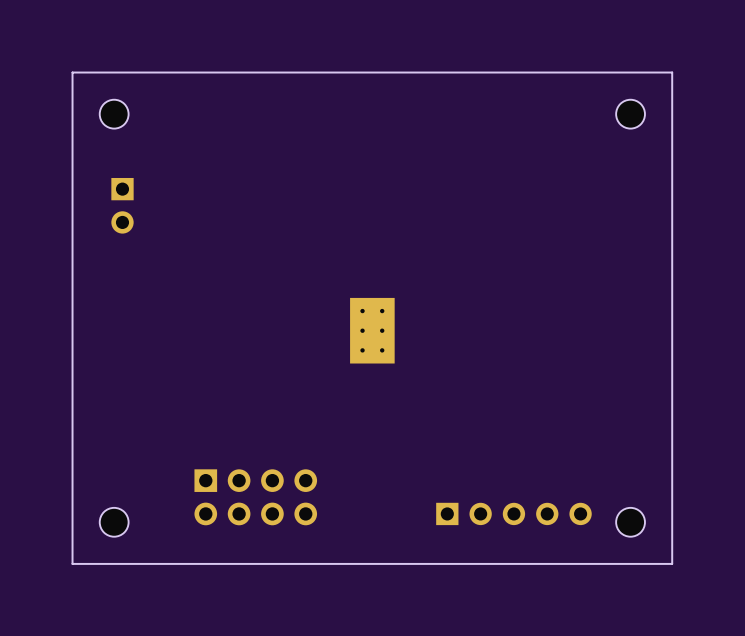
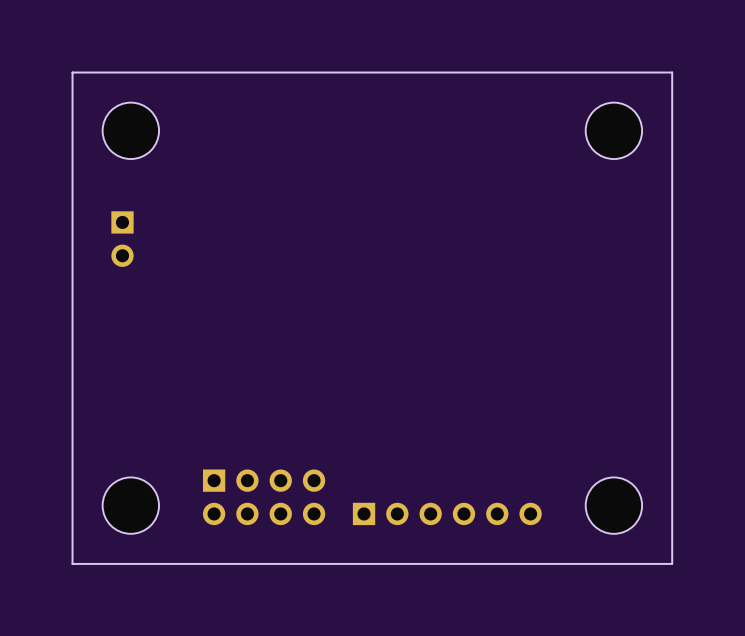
part: (114, 114) -> none
part: (630, 114) -> none
part: none -> (130, 130)
part: none -> (613, 130)
part position: (122, 205) -> (122, 239)
part: (372, 330) -> none
part footprint: [194, 469, 318, 526] -> [202, 469, 326, 526]
part: none -> (130, 505)
part: none -> (613, 505)
part: none -> (447, 513)
part: (513, 513) -> none
part: (114, 522) -> none
part: (630, 522) -> none

